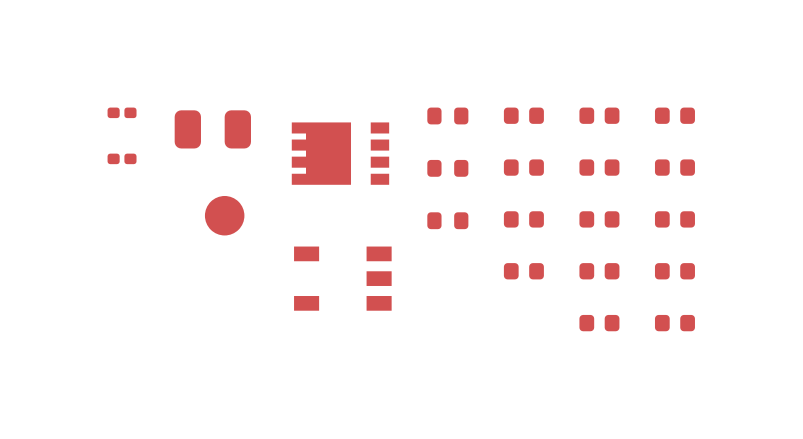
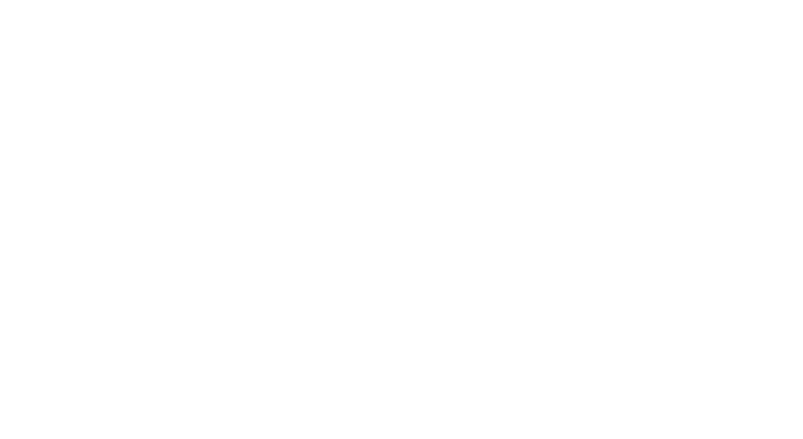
part: (122, 112) -> none
part: (447, 115) -> none
part: (523, 115) -> none
part: (599, 115) -> none
part: (674, 115) -> none
part: (212, 129) -> none
part: (340, 153) -> none
part: (122, 158) -> none
part: (523, 167) -> none
part: (599, 167) -> none
part: (674, 167) -> none
part: (447, 168) -> none
part: (224, 215) -> none
part: (523, 219) -> none
part: (599, 219) -> none
part: (674, 219) -> none
part: (447, 220) -> none
part: (523, 271) -> none
part: (599, 271) -> none
part: (674, 271) -> none
part: (342, 278) -> none
part: (599, 323) -> none
part: (674, 323) -> none

